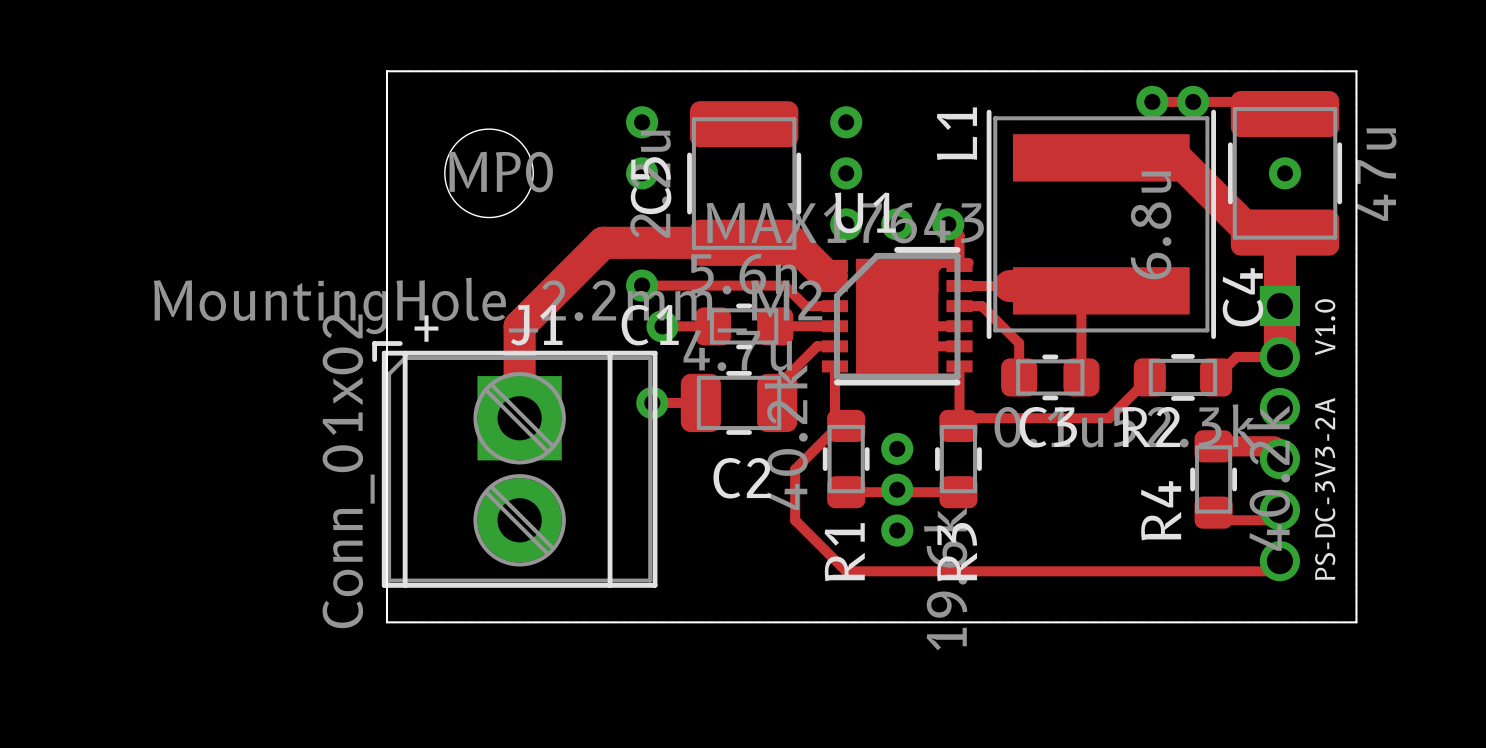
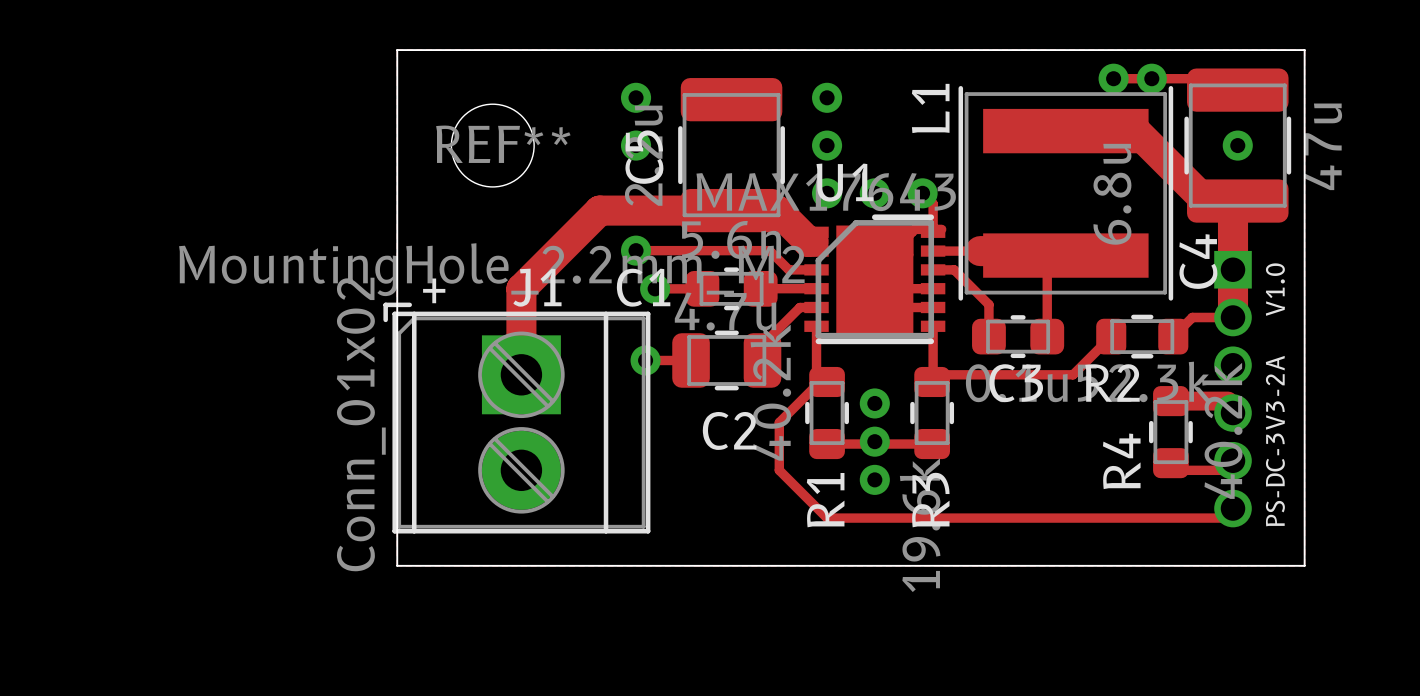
MP0 name: MP0 (500, 172) -> REF** (503, 144)

